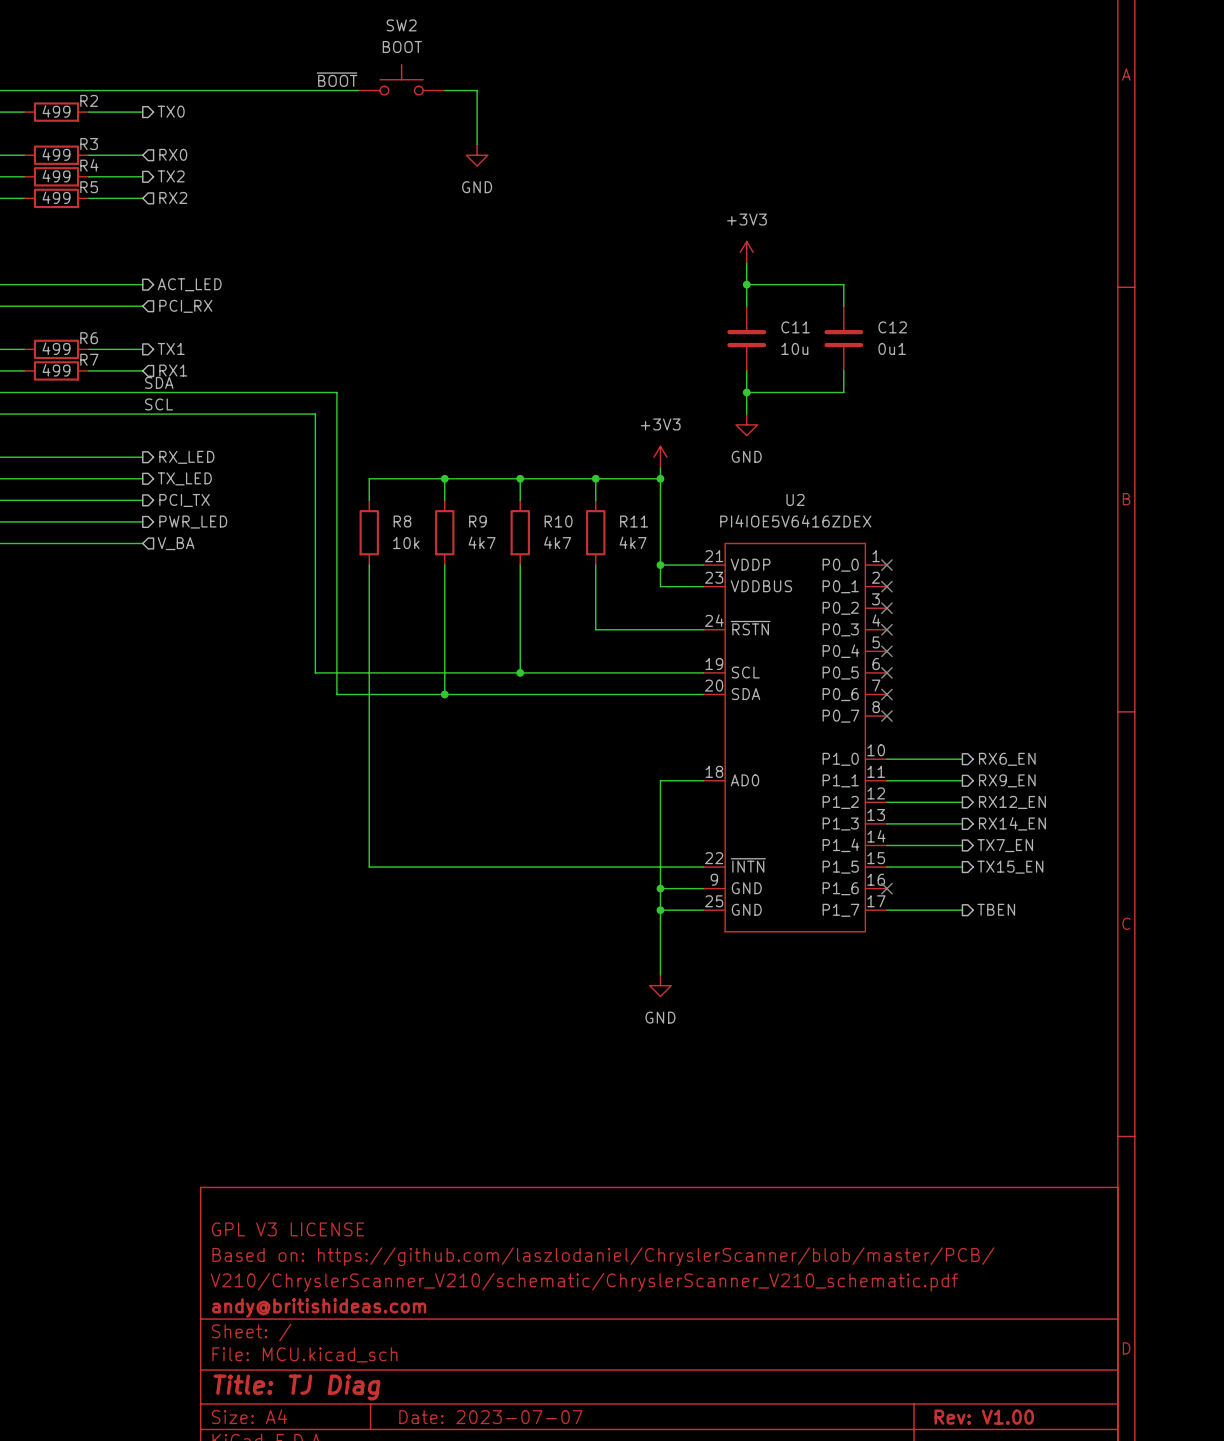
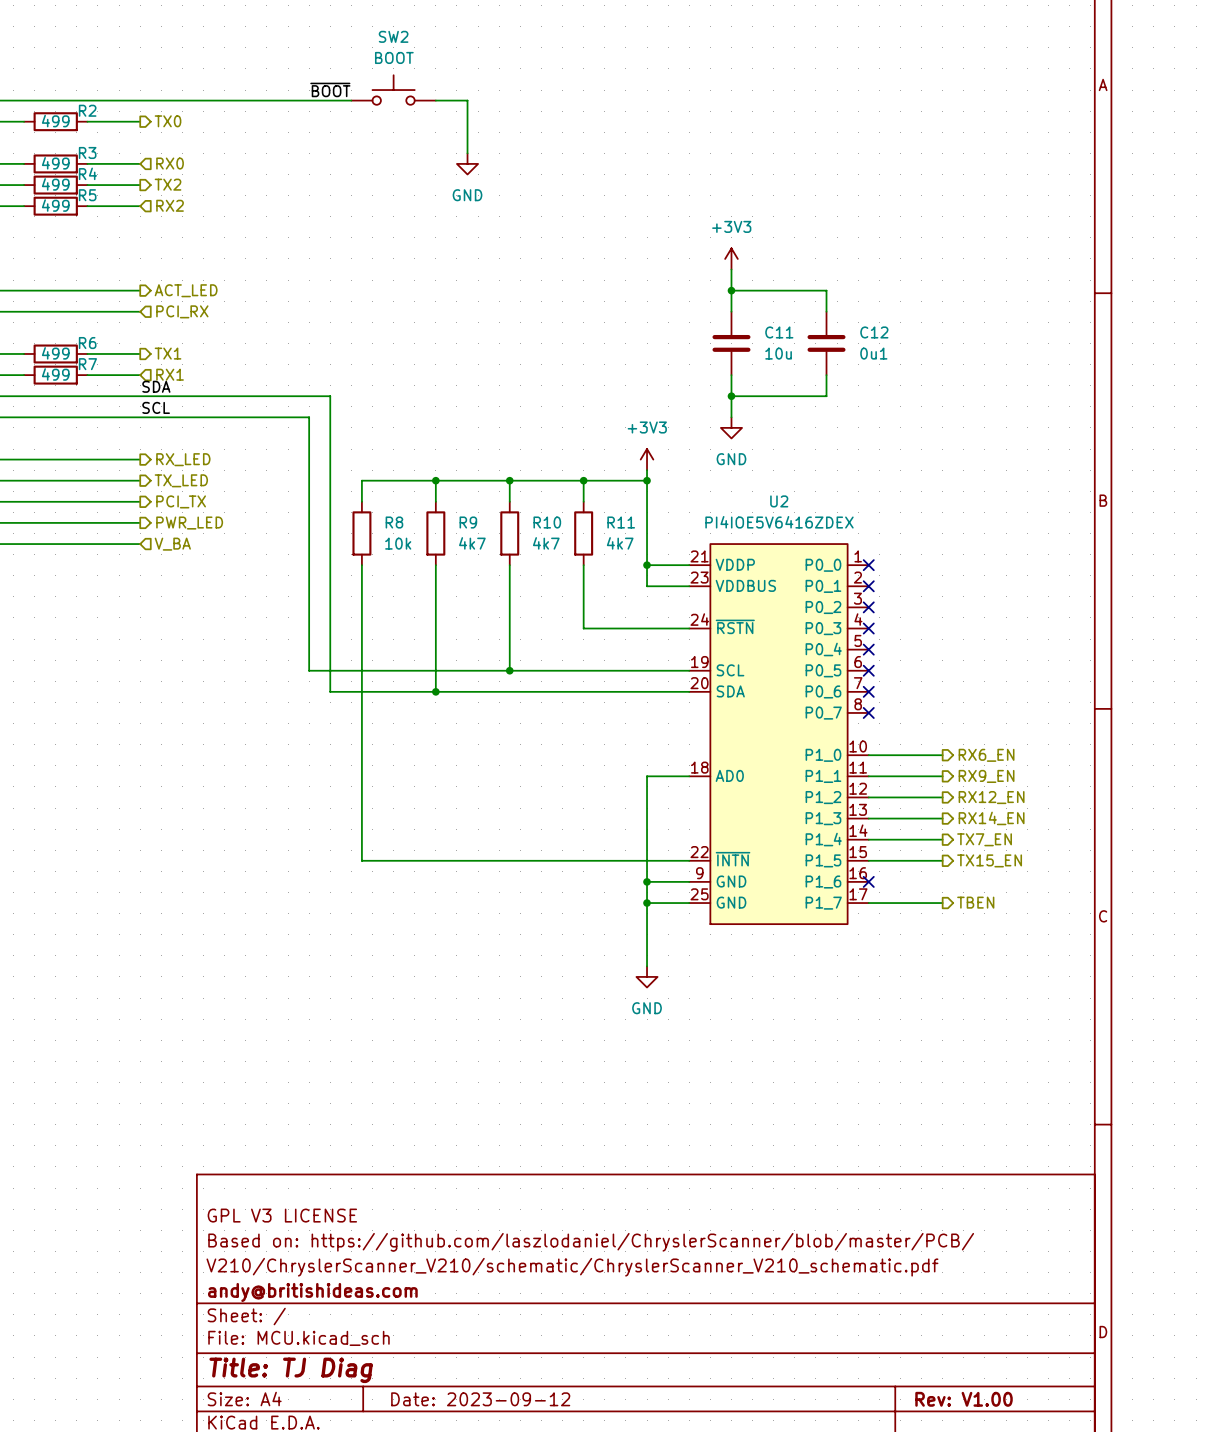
title block: Date: 2023-07-07 (490, 1417) -> Date: 2023-09-12 (480, 1399)

